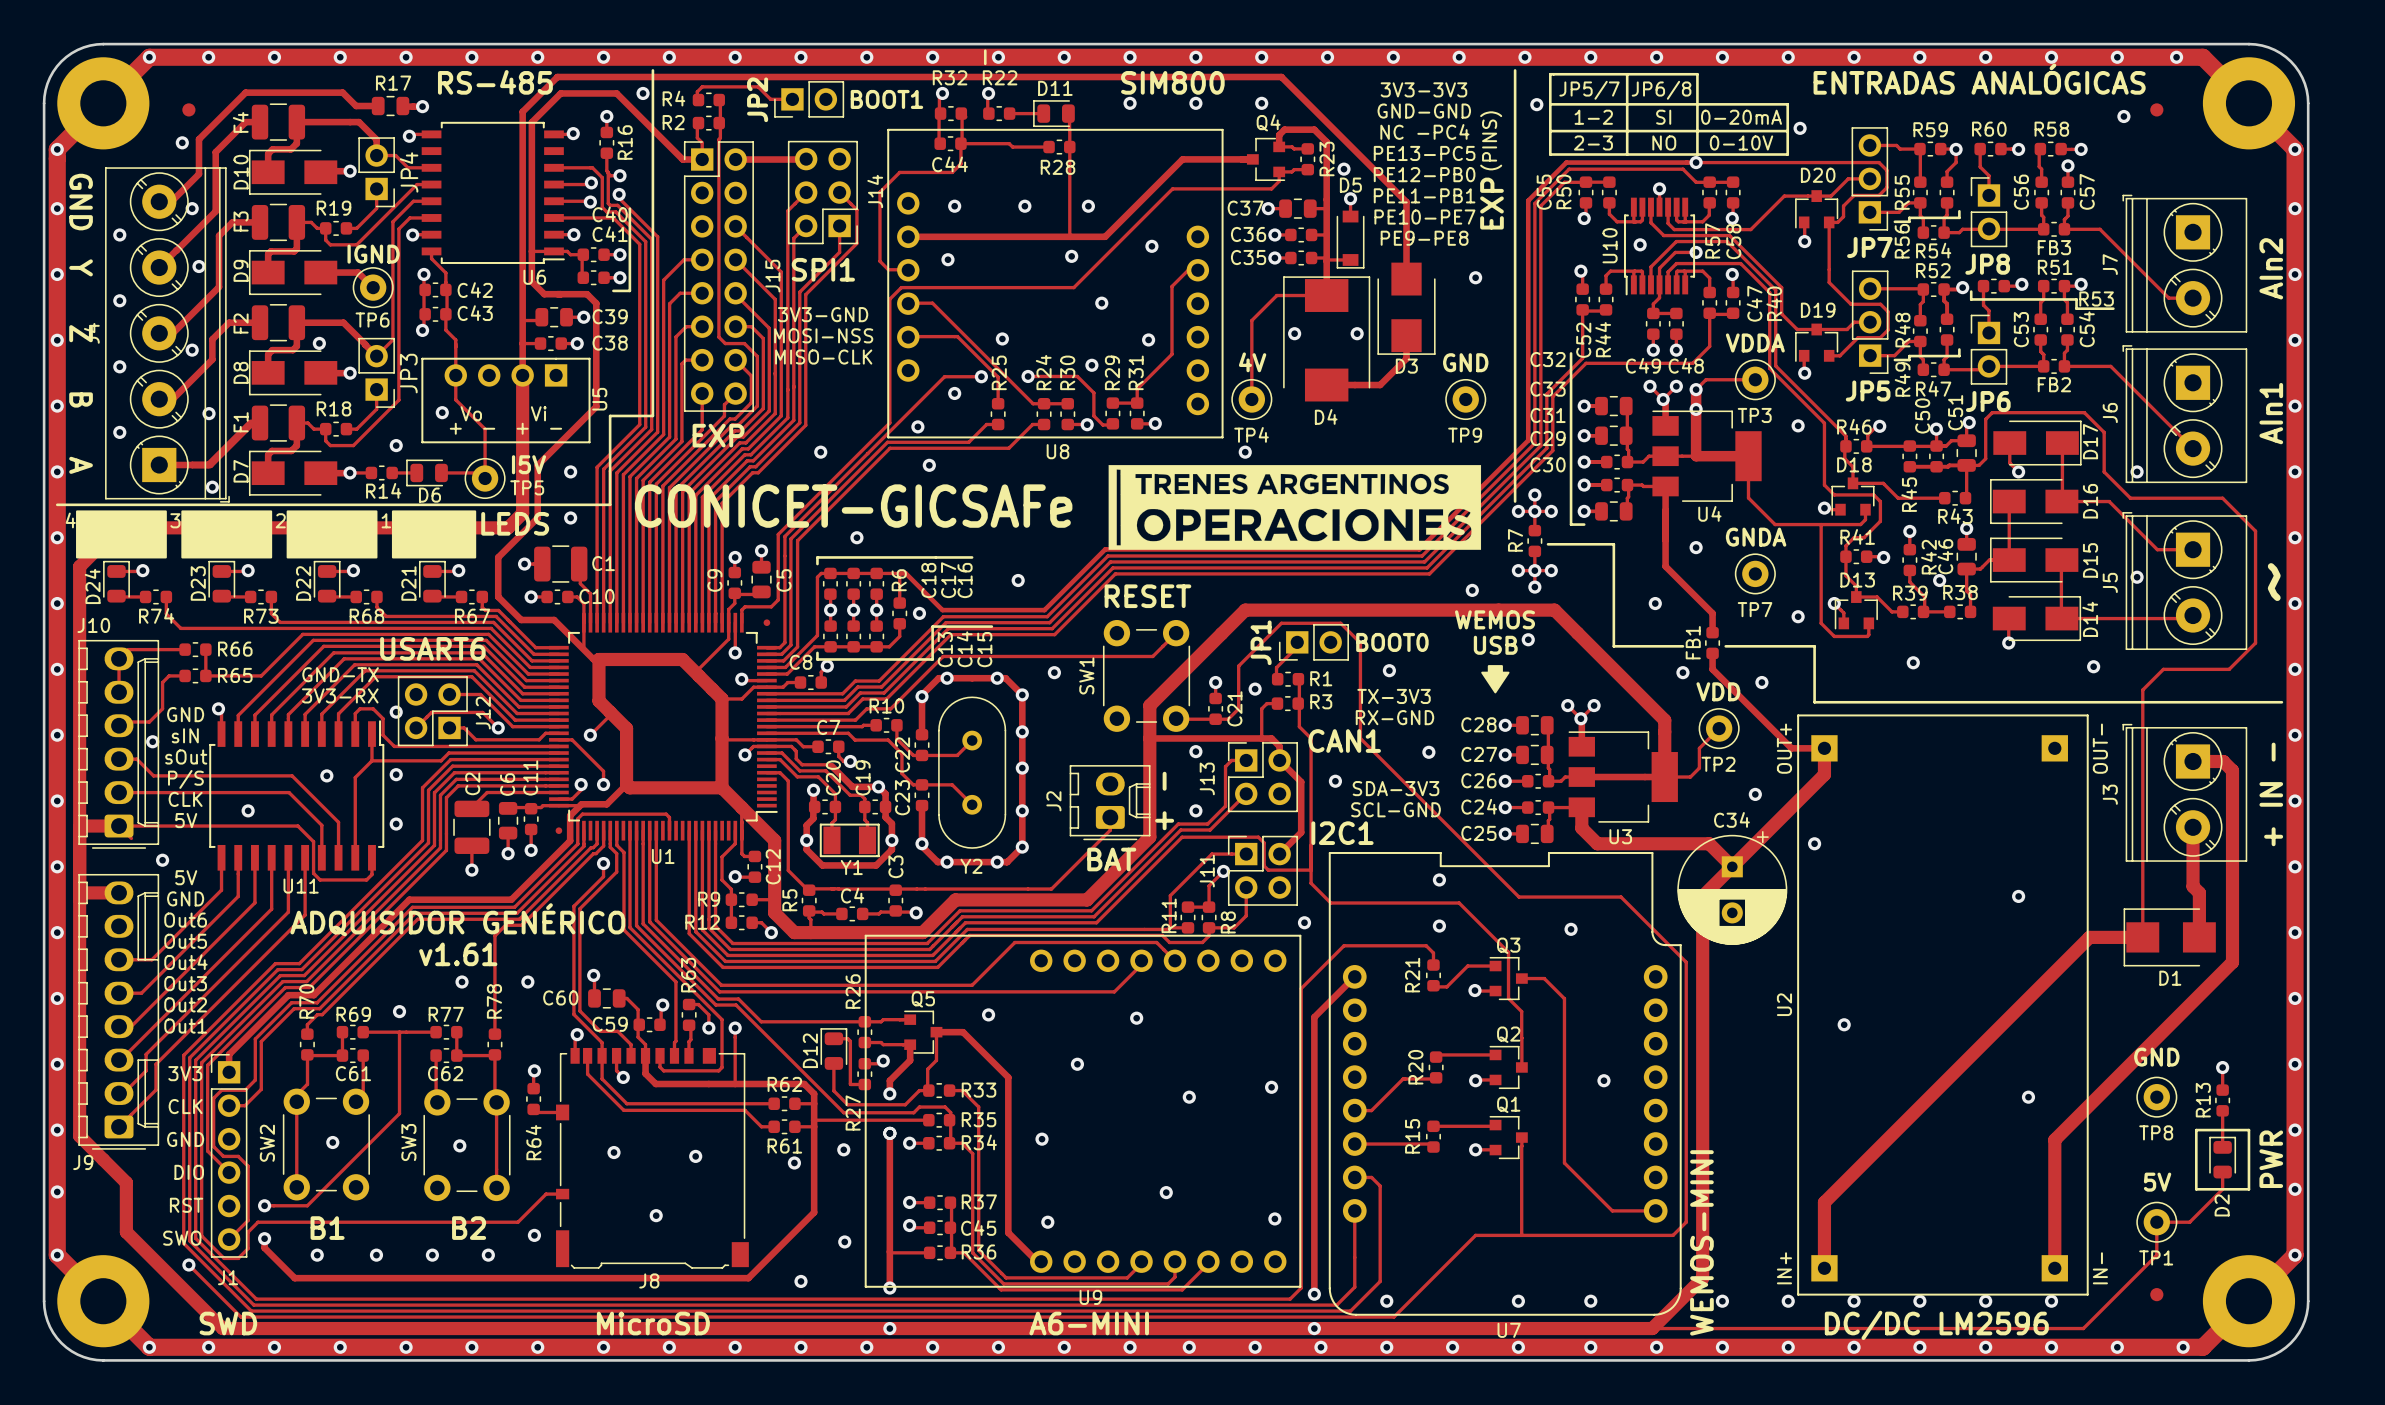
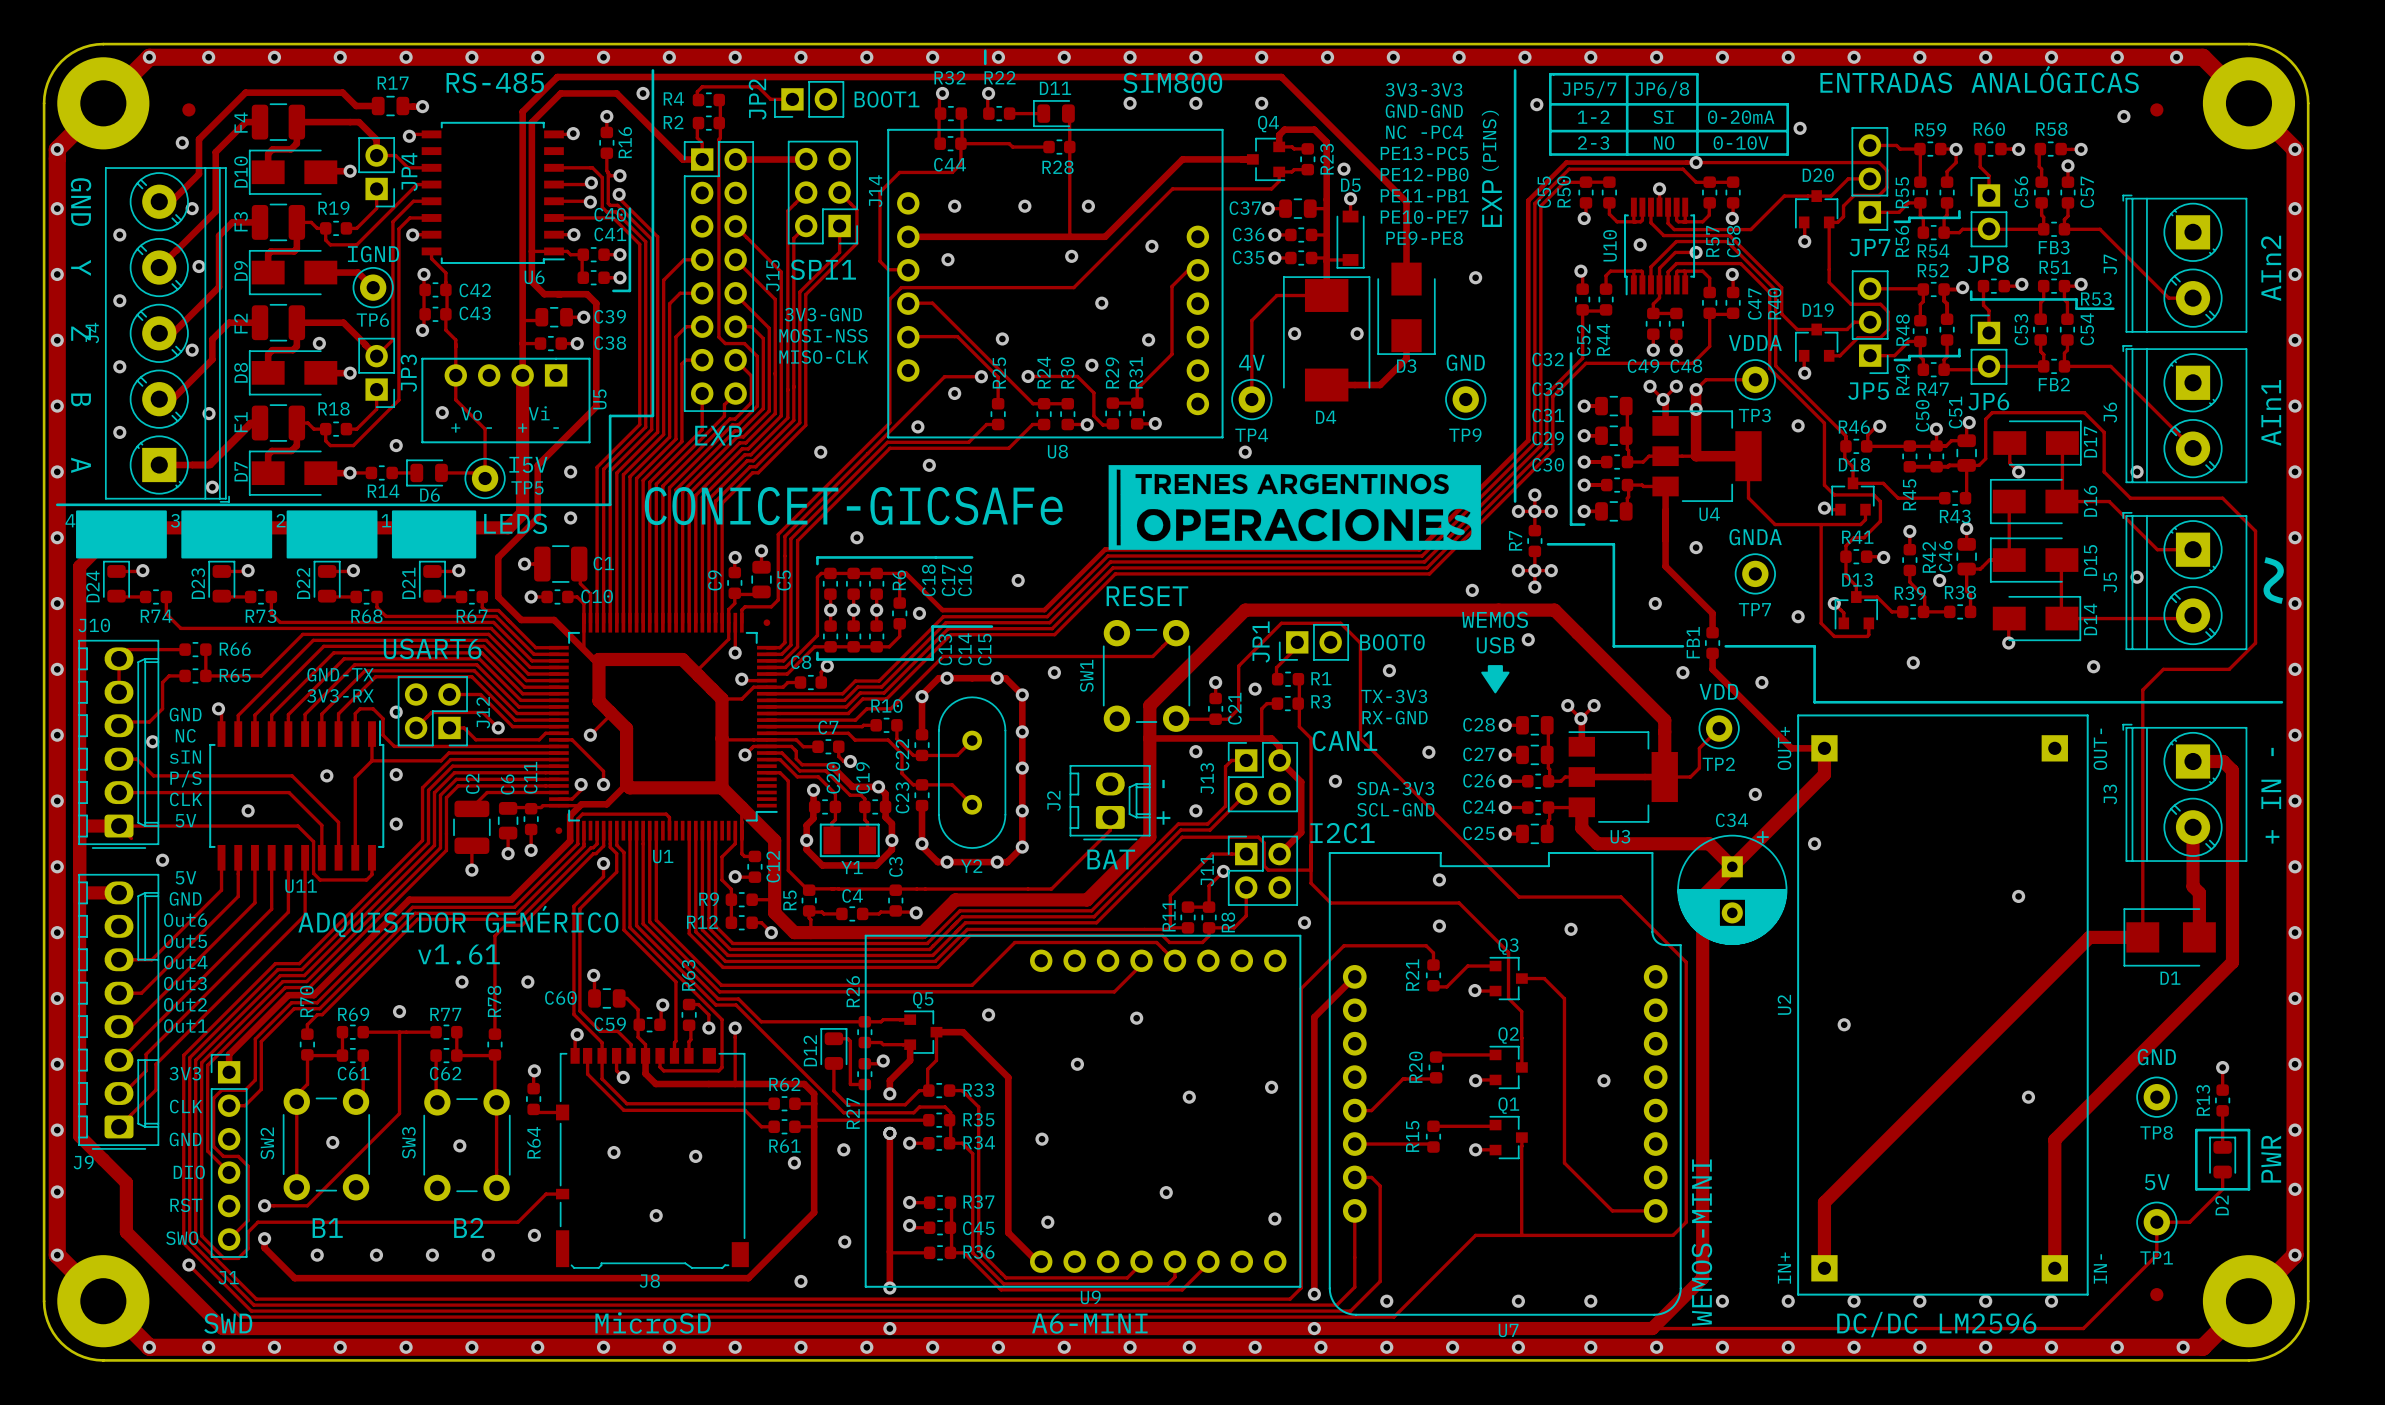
text: sIN (185, 735) -> NC (185, 735)
text: sOut (186, 757) -> sIN (185, 757)

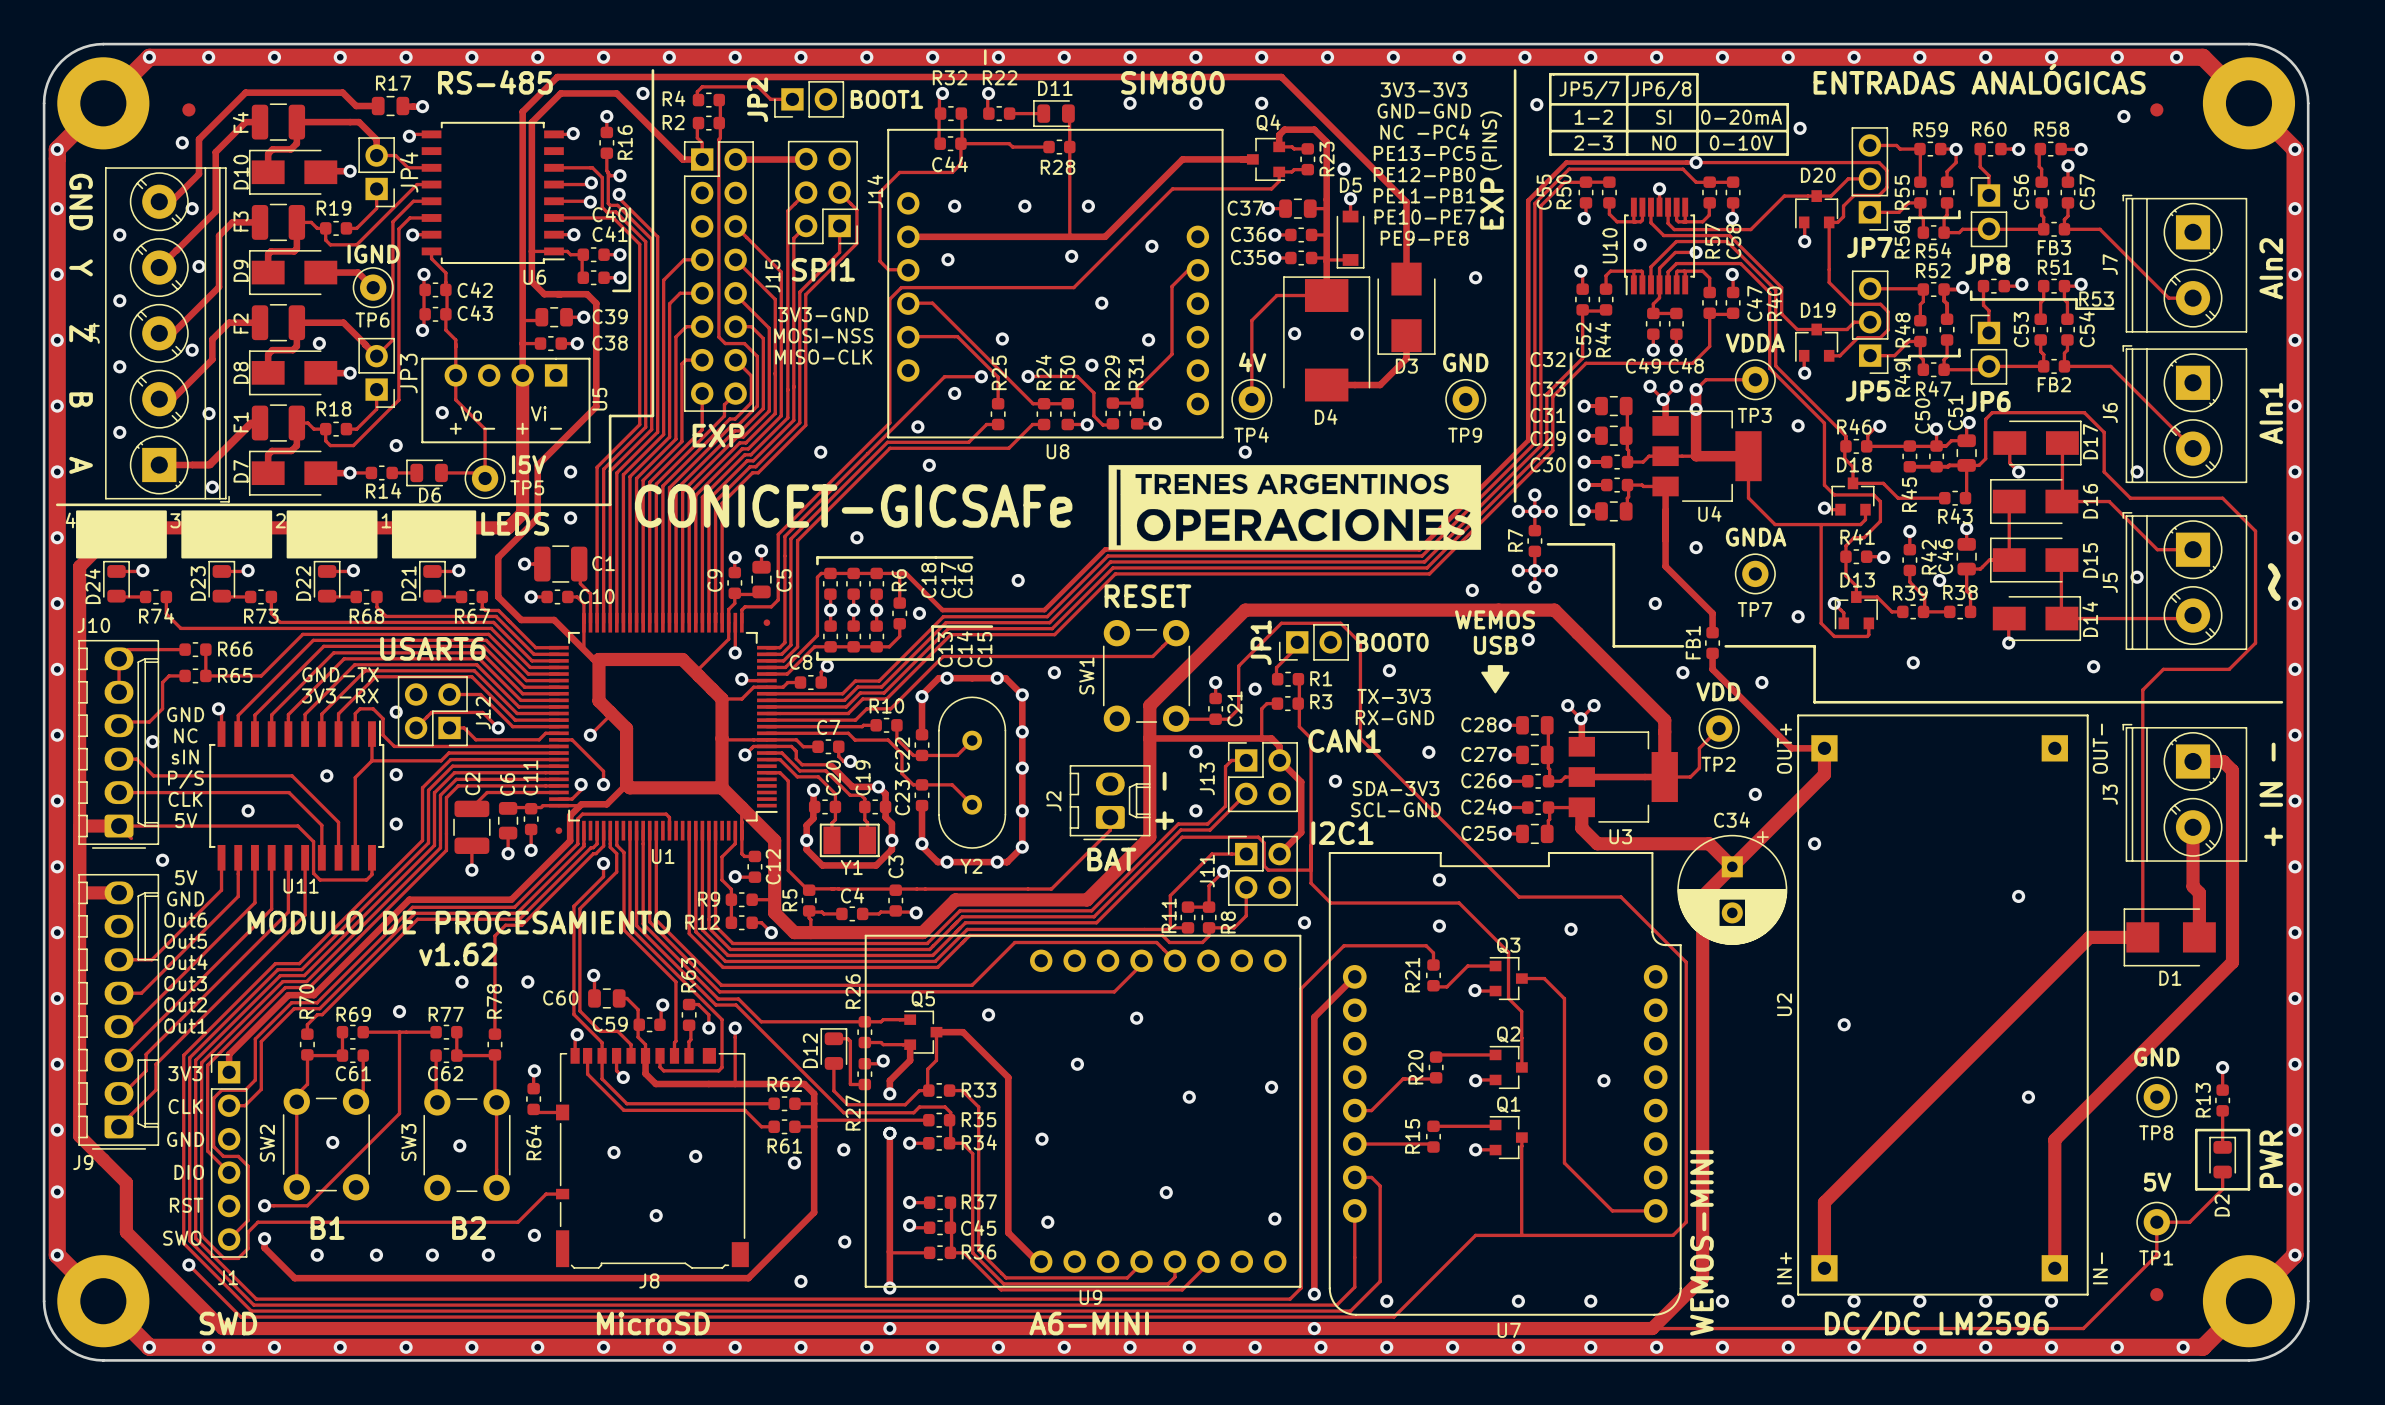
text: ADQUISIDOR GENÉRICO (458, 921) -> MODULO DE PROCESAMIENTO (459, 922)
text: v1.61 (458, 954) -> v1.62 (458, 954)

